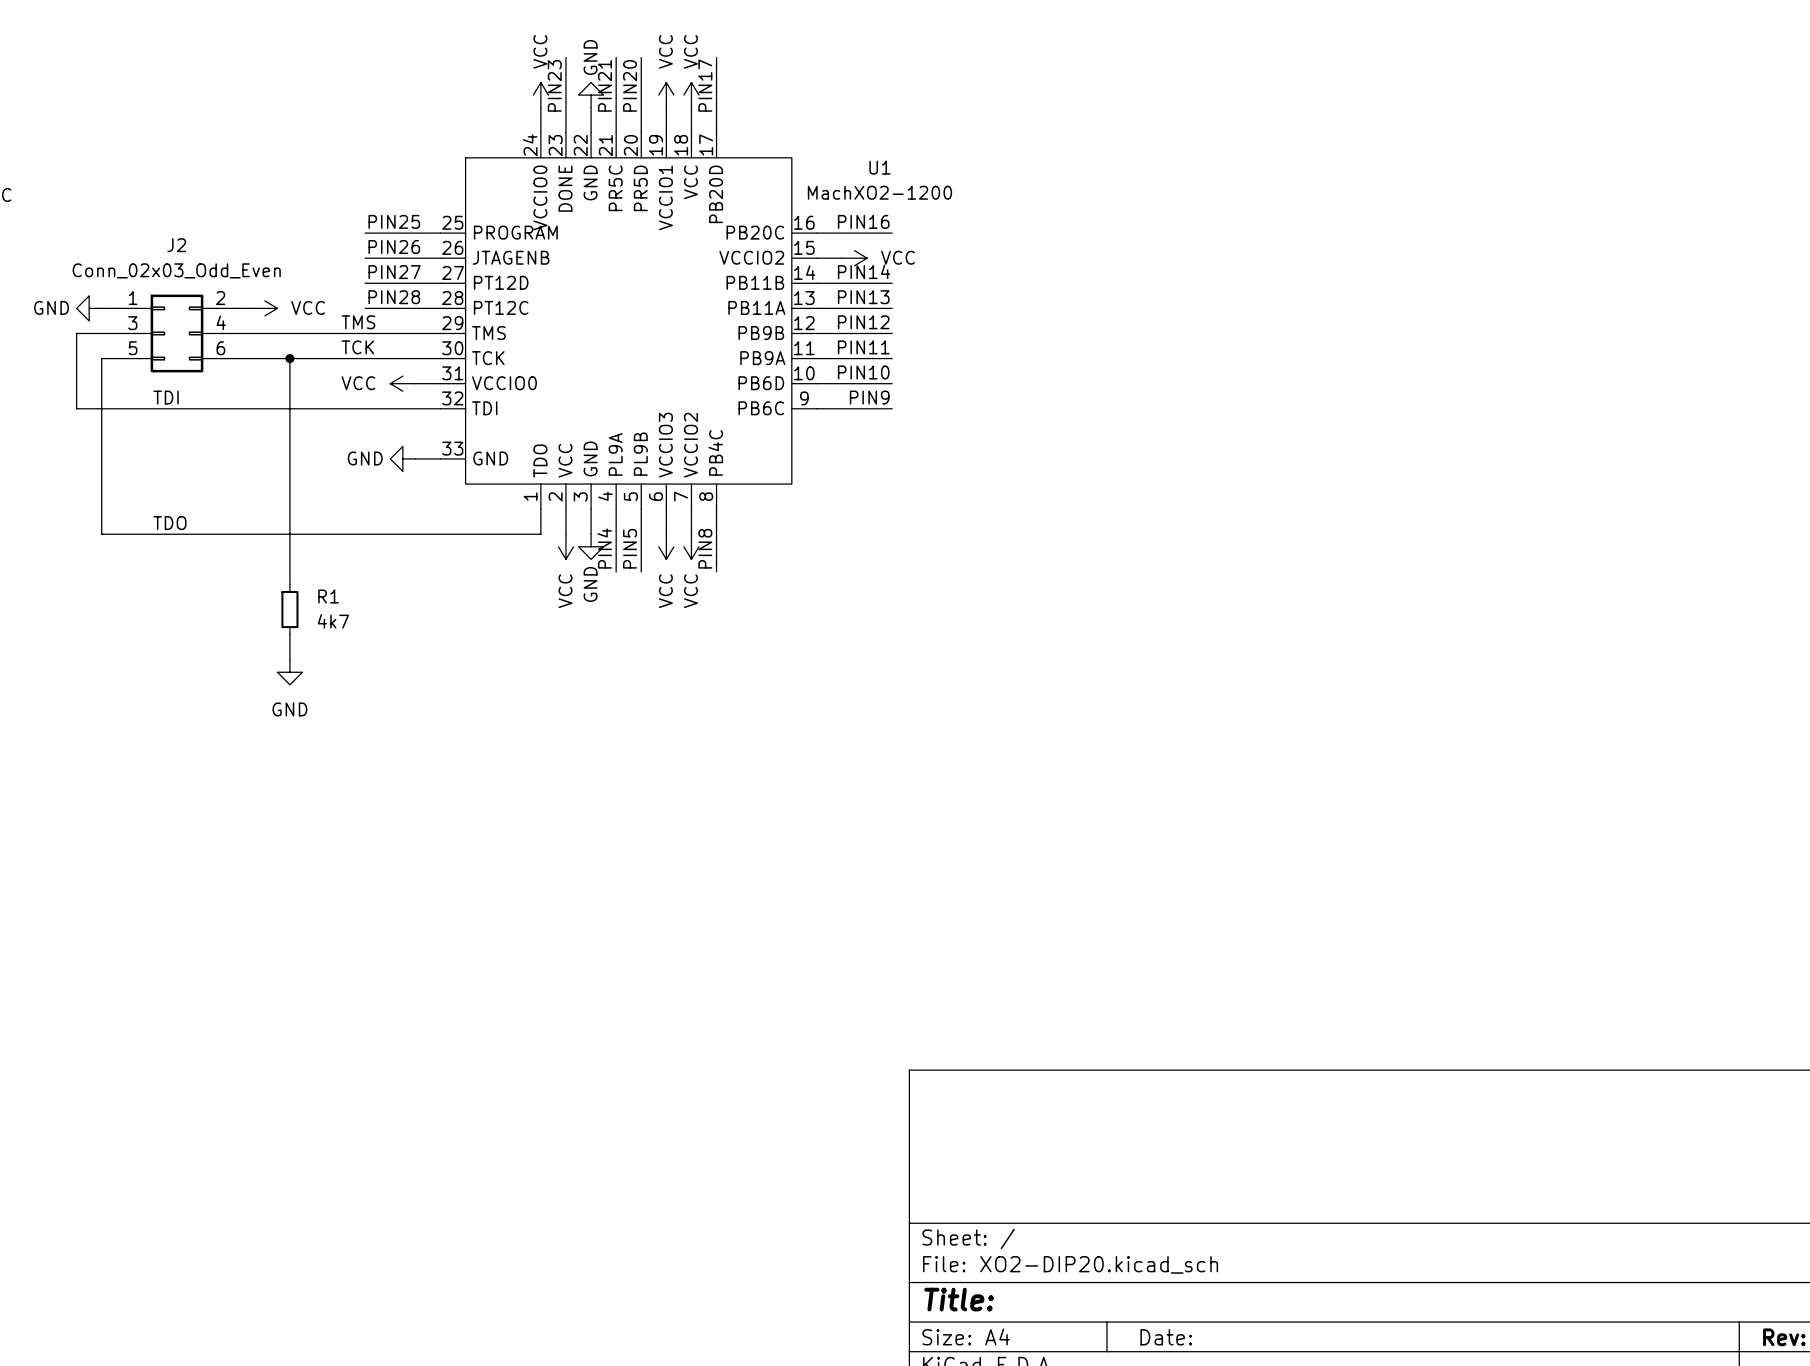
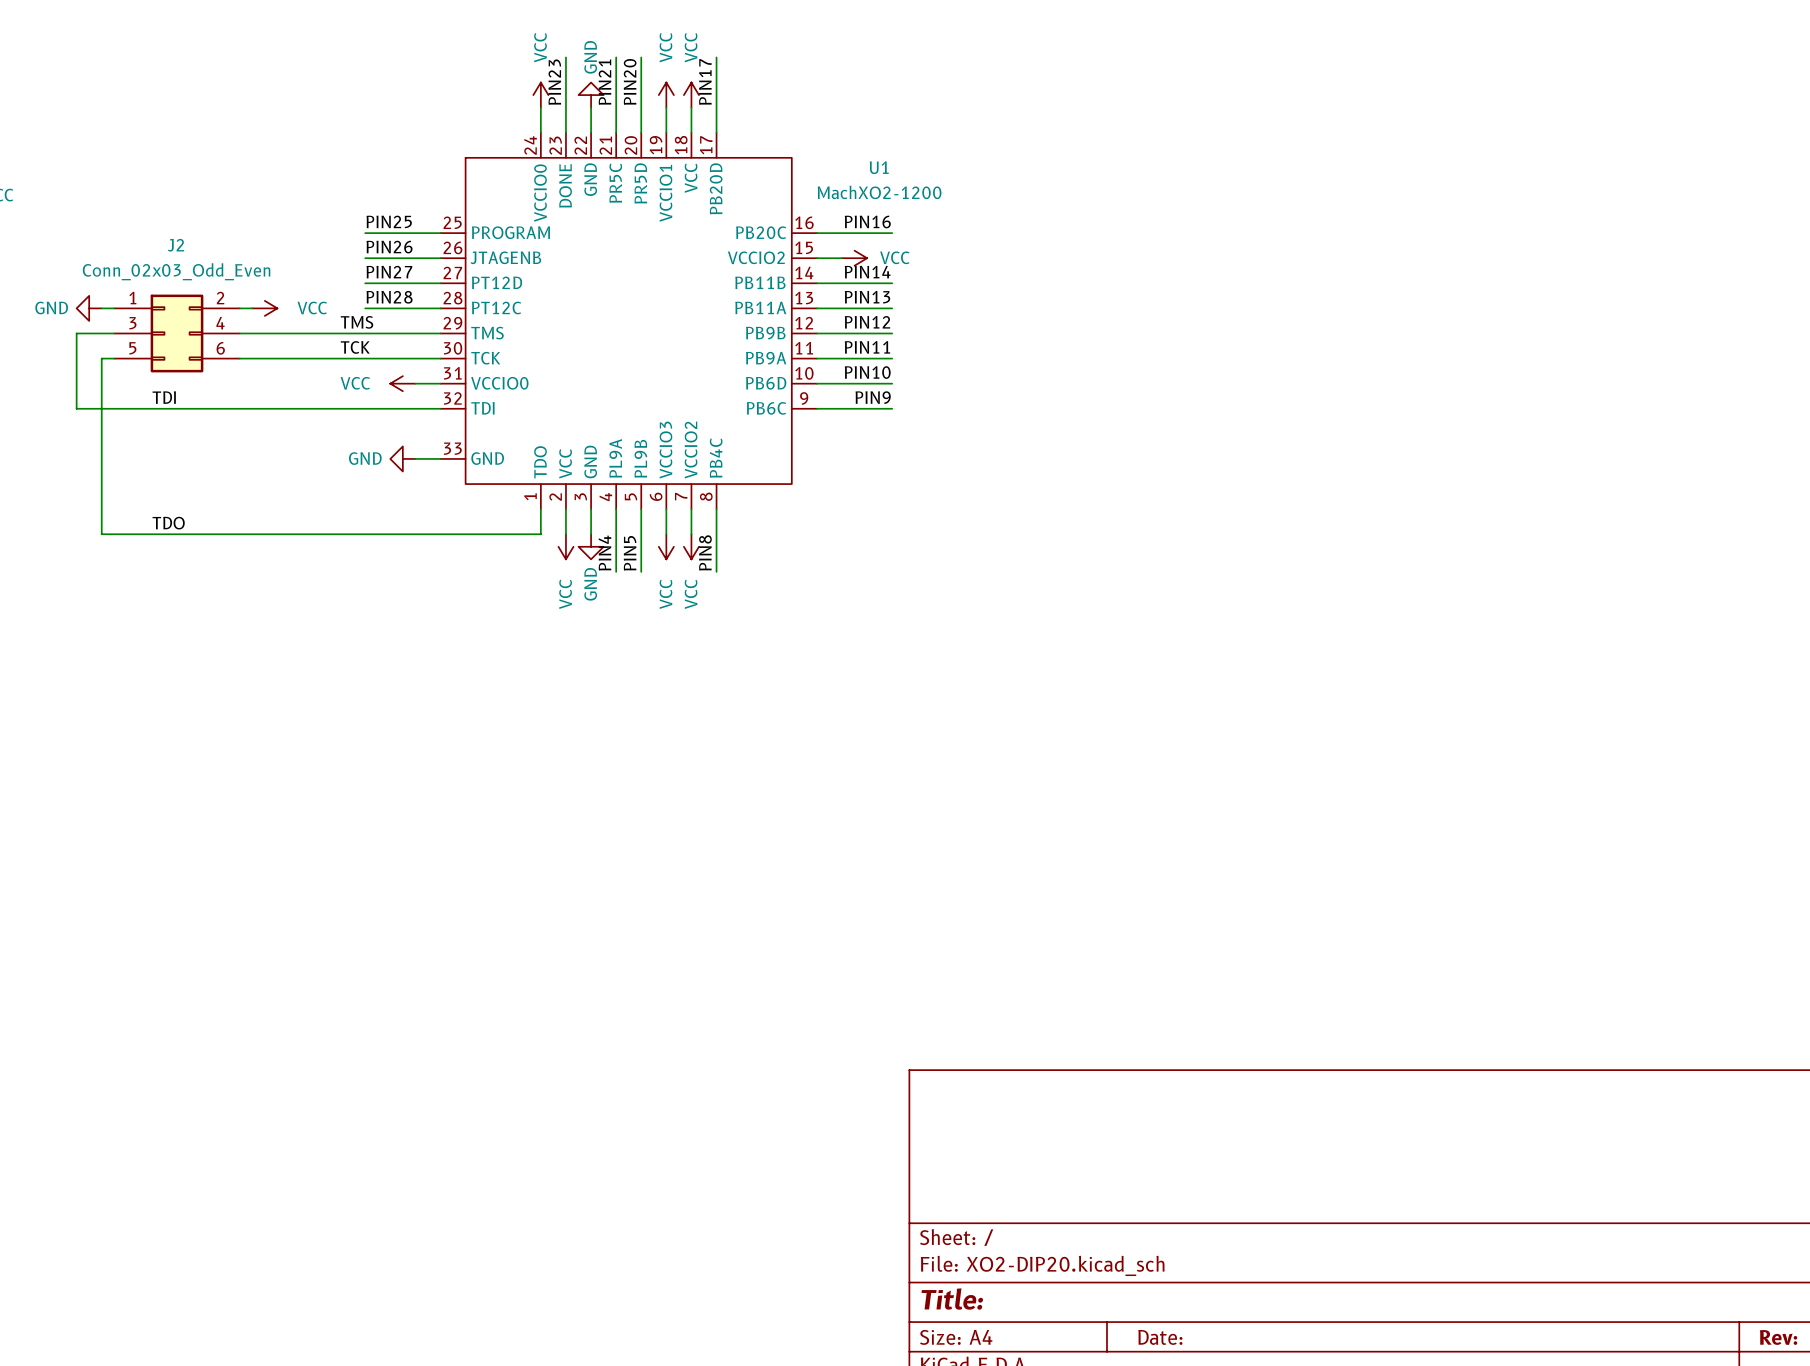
wire: (289, 358) (289, 584) -> none
junction: (289, 358) -> none
R1: 4k7 (289, 609) -> none
wire: (289, 634) (289, 659) -> none
power symbol: GND (289, 672) -> none

